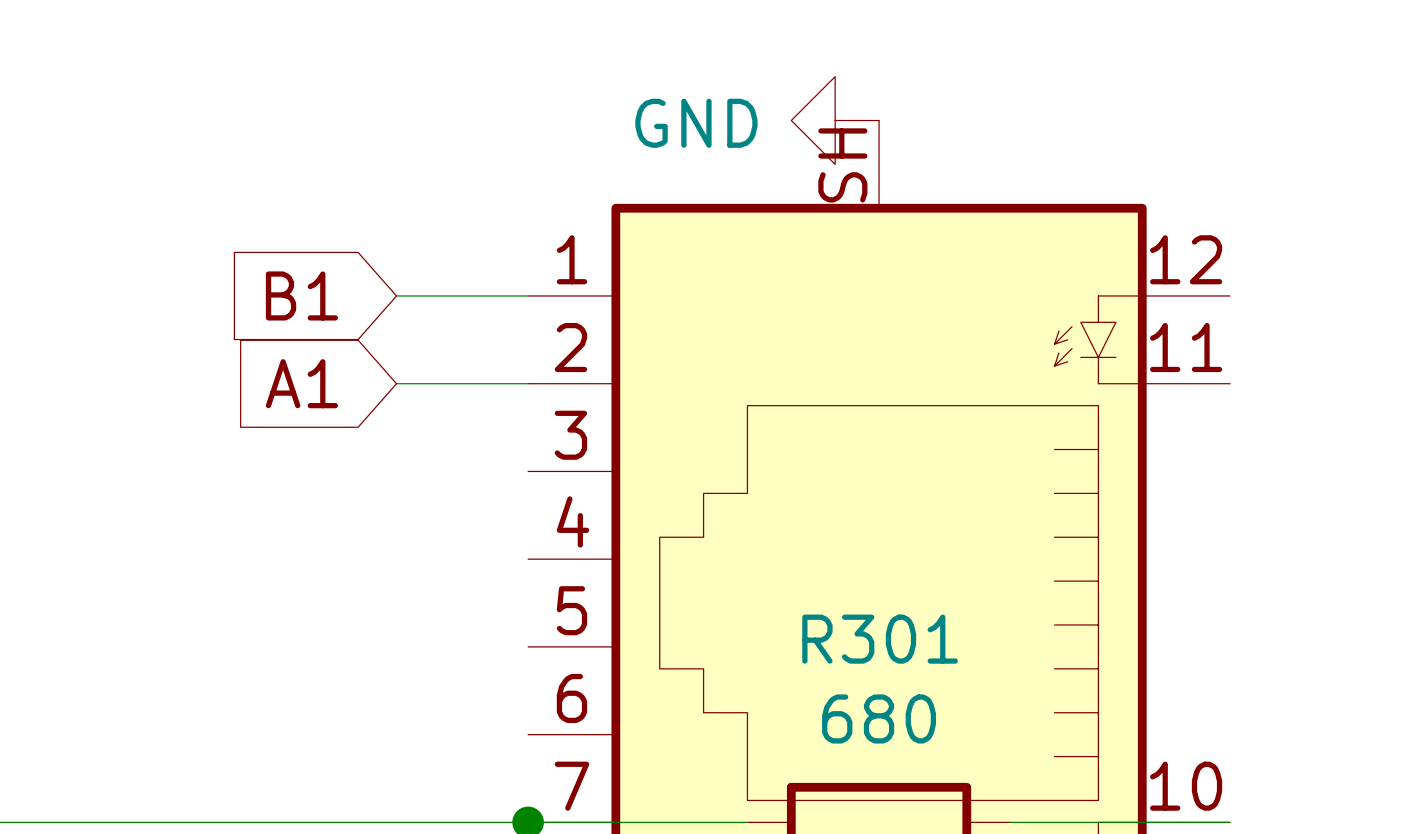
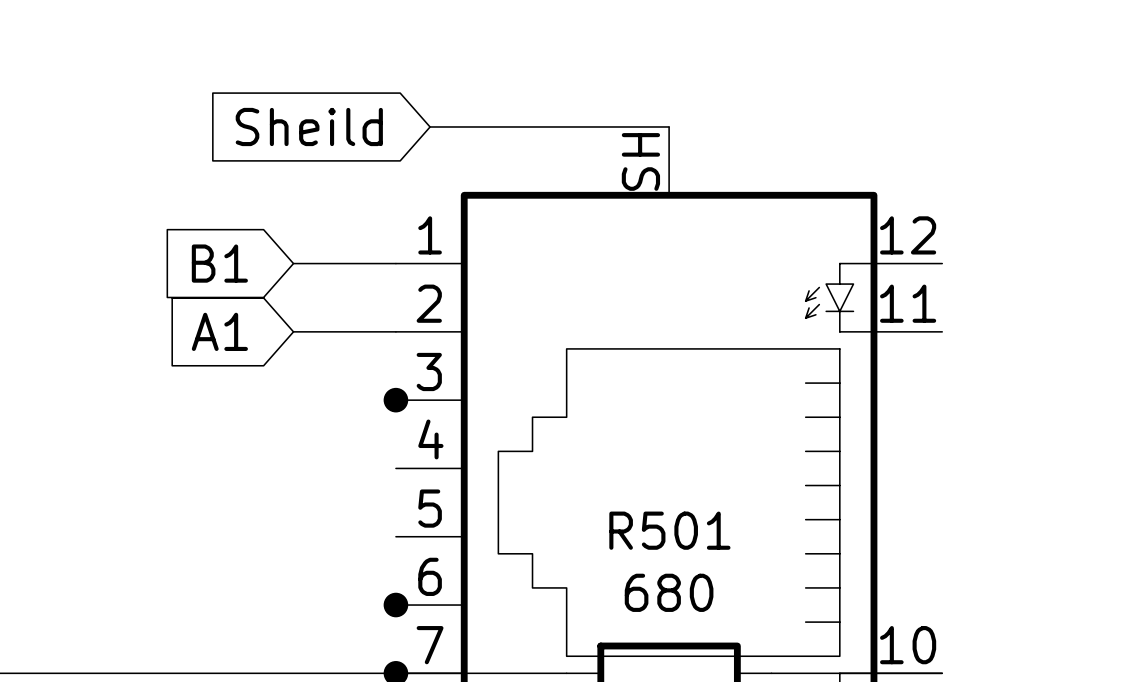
global label: none -> Sheild (309, 126)
wire: none -> (430, 126) (669, 126)
power symbol: GND (835, 120) -> none
junction: none -> (395, 400)
R301 name: R301 (880, 639) -> R501 (669, 530)
junction: none -> (395, 605)

